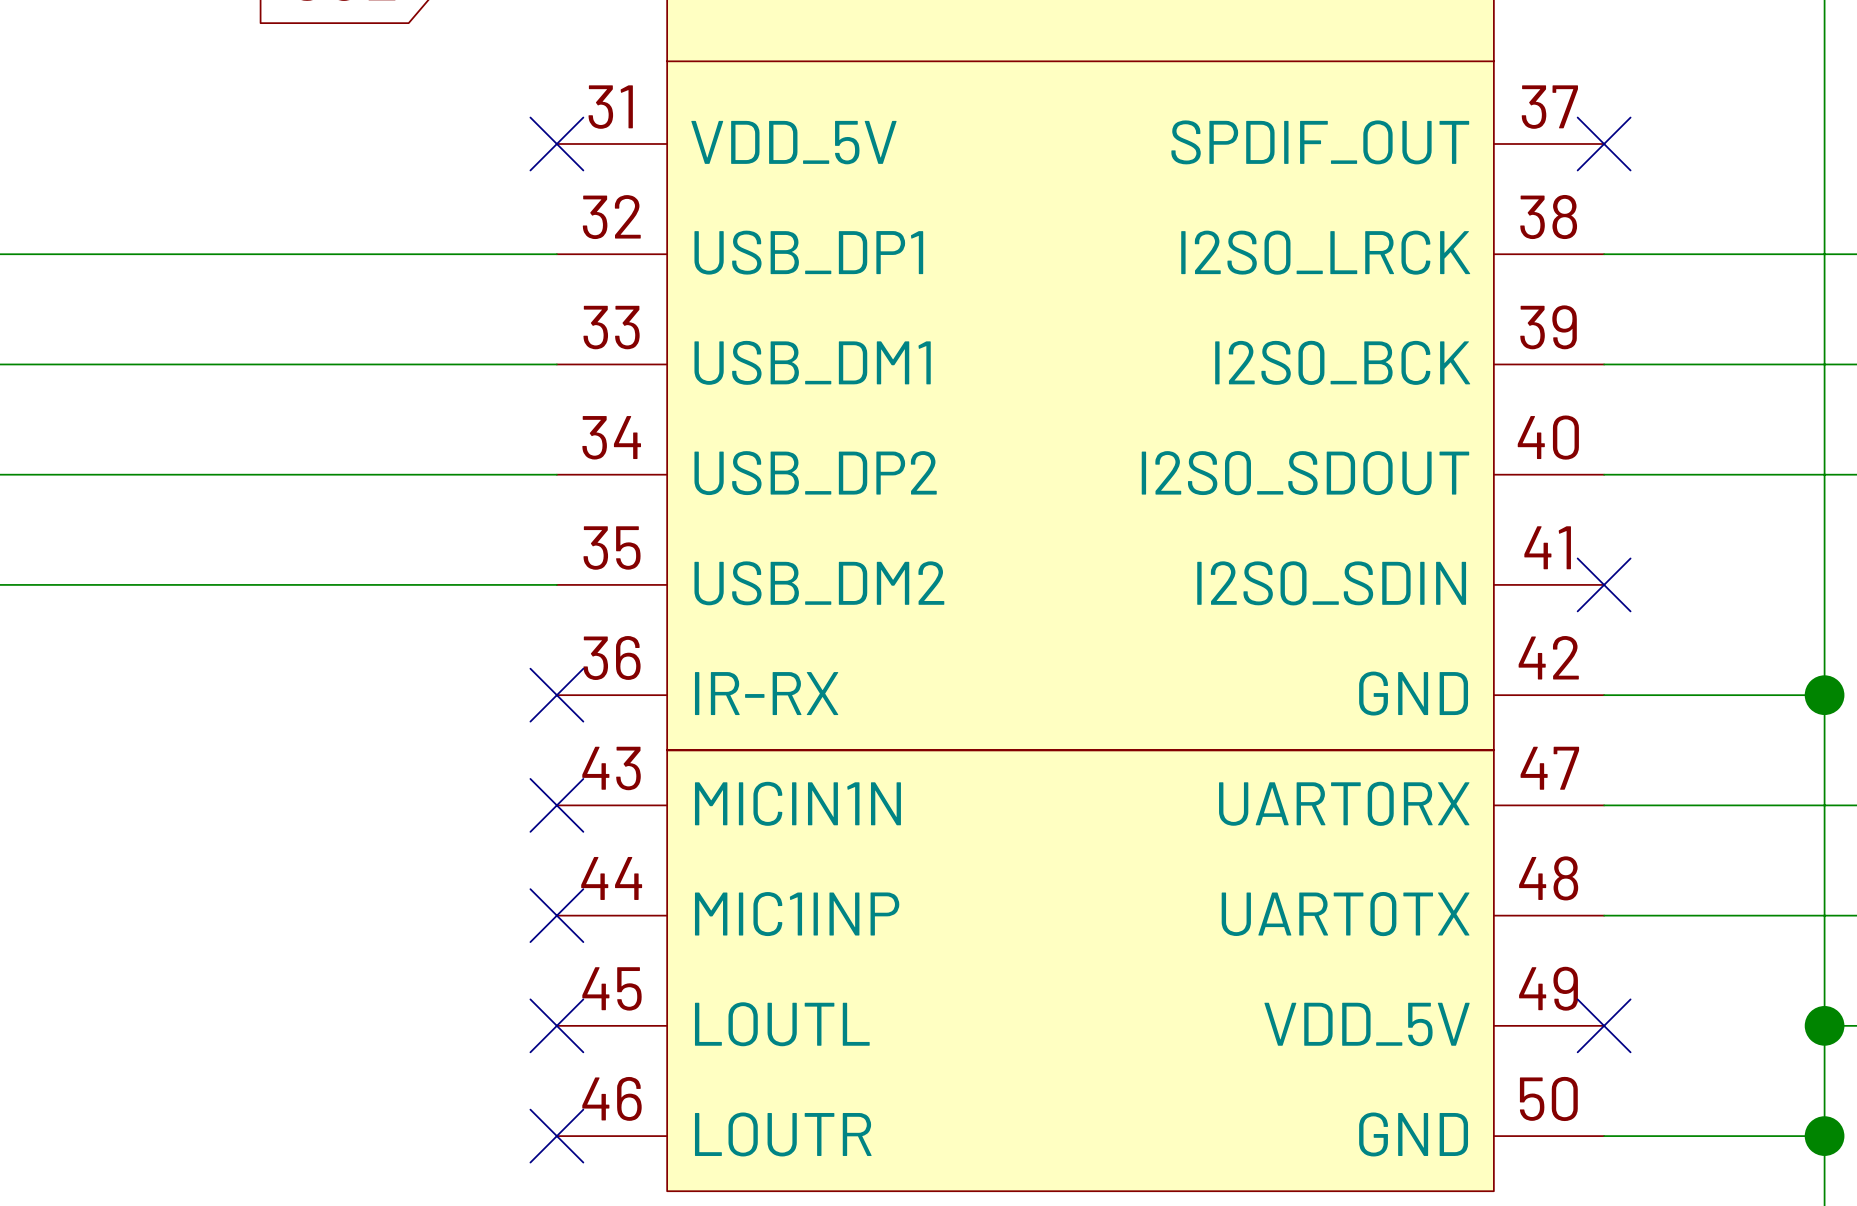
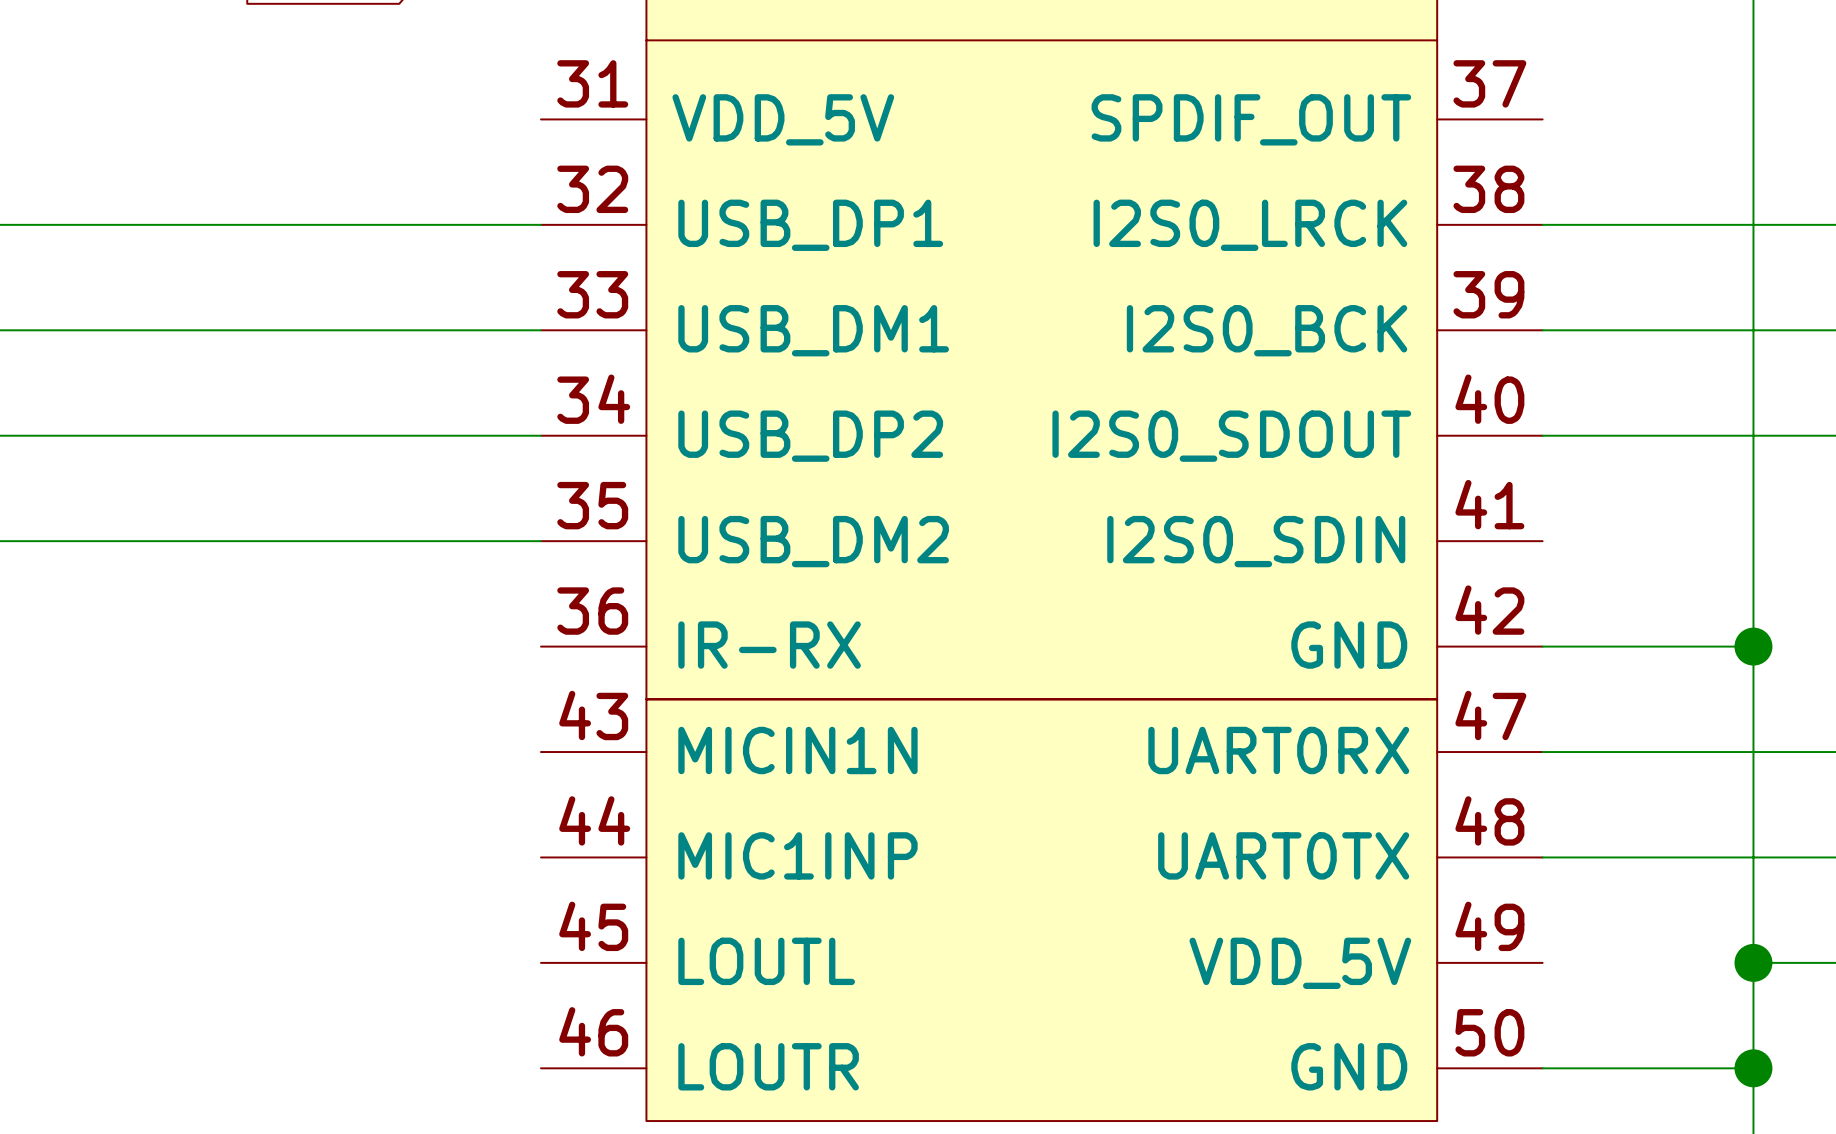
no-connect mark: (556, 143) -> none
no-connect mark: (1604, 143) -> none
no-connect mark: (1604, 584) -> none
no-connect mark: (556, 695) -> none
no-connect mark: (556, 805) -> none
no-connect mark: (556, 915) -> none
no-connect mark: (556, 1025) -> none
no-connect mark: (1604, 1025) -> none
no-connect mark: (556, 1136) -> none

